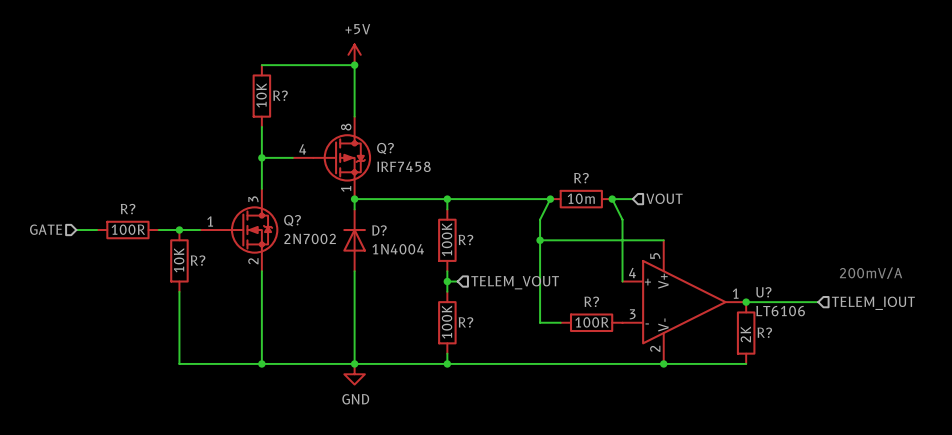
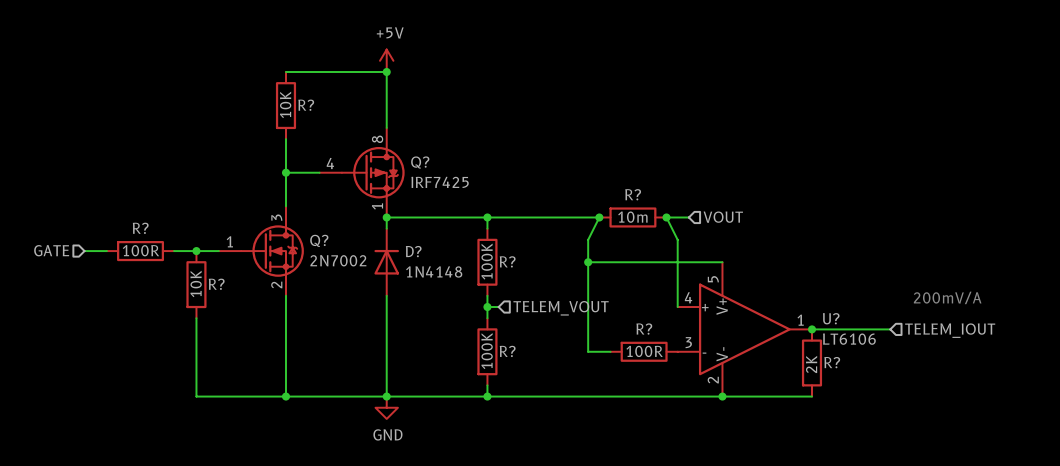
Q? value: IRF7458 (404, 166) -> IRF7425 (440, 182)
D? value: 1N4004 (398, 249) -> 1N4148 (434, 271)

